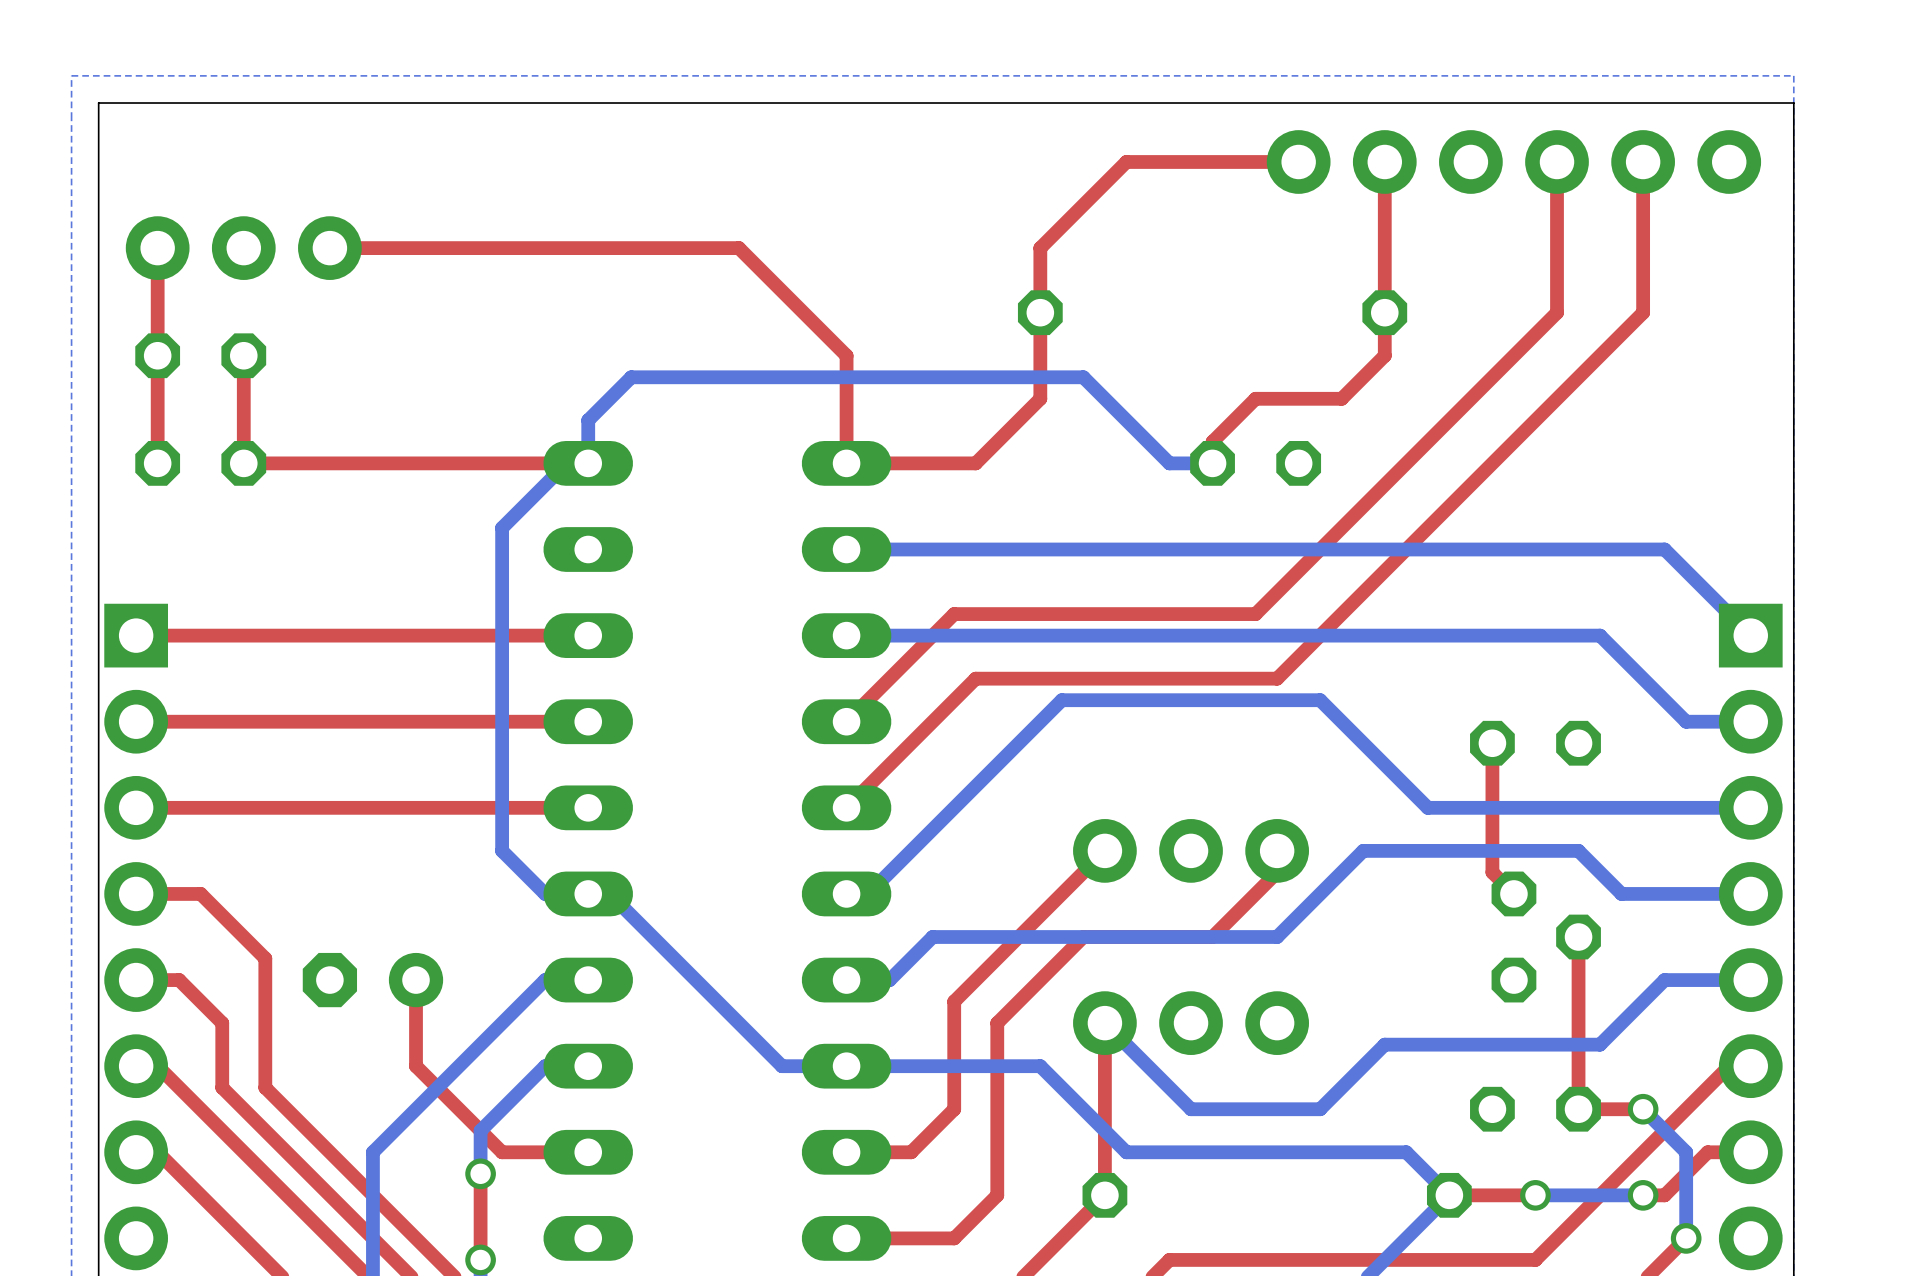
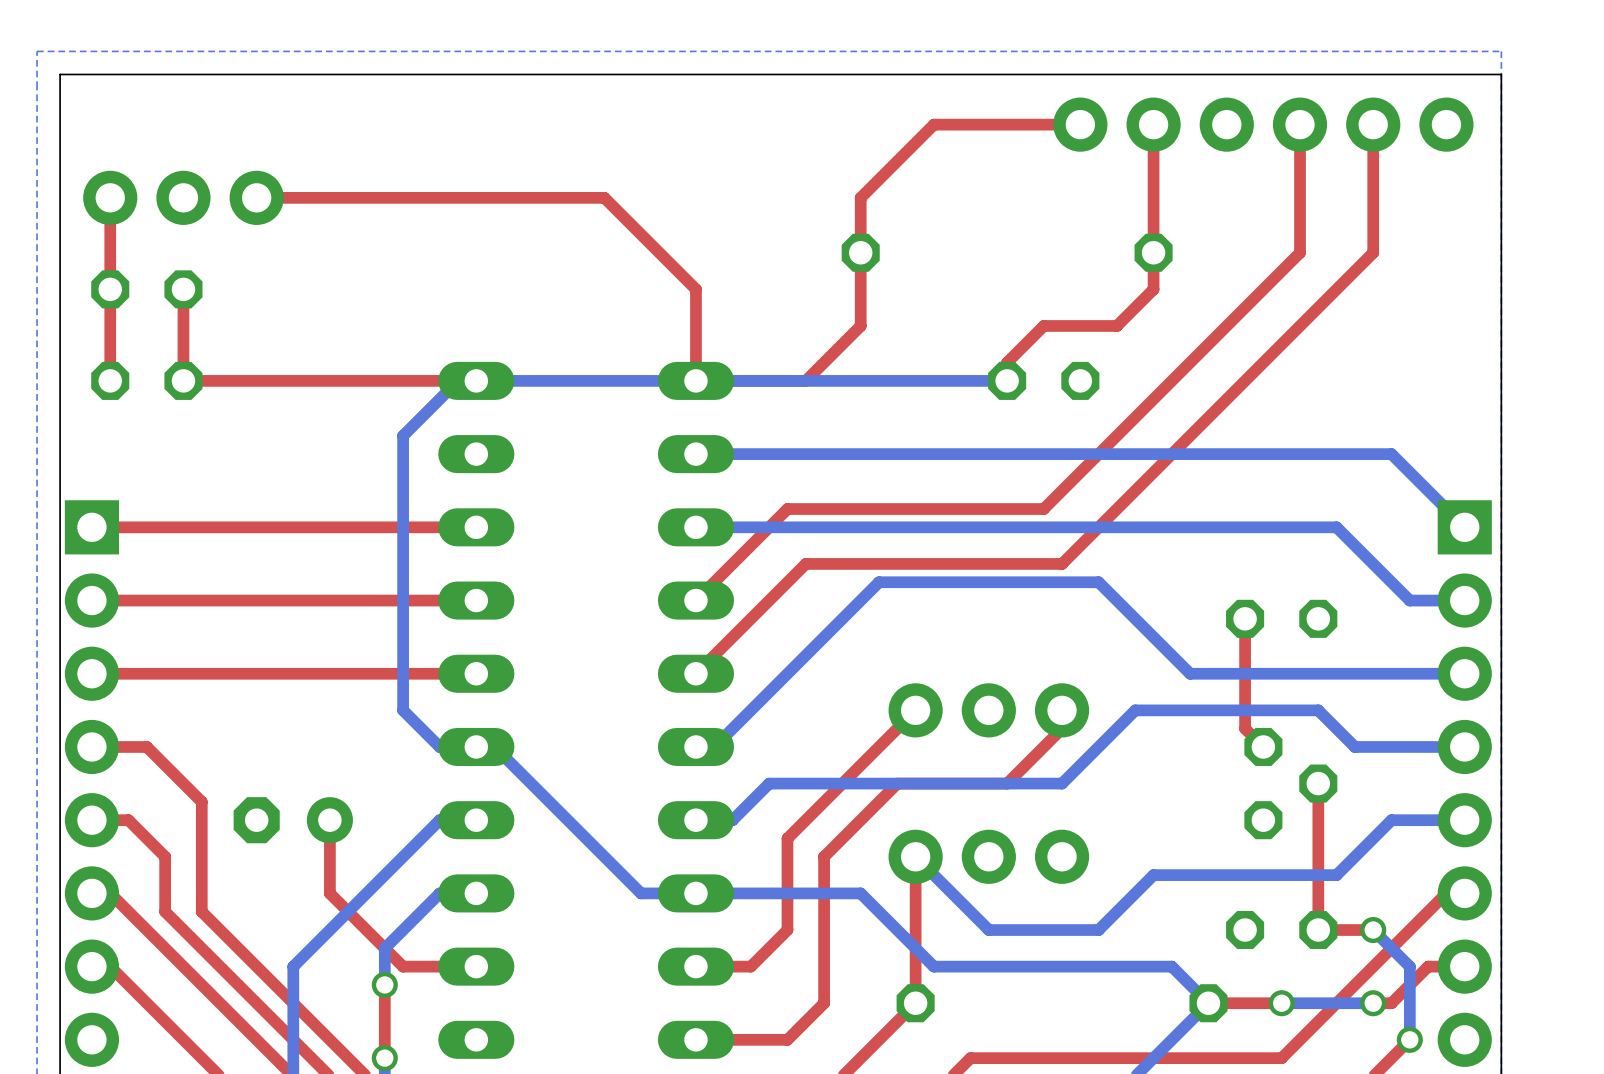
bottom track: (1169, 463) (1083, 377) (631, 377) (588, 420) (588, 463) -> (970, 380) (476, 380)

